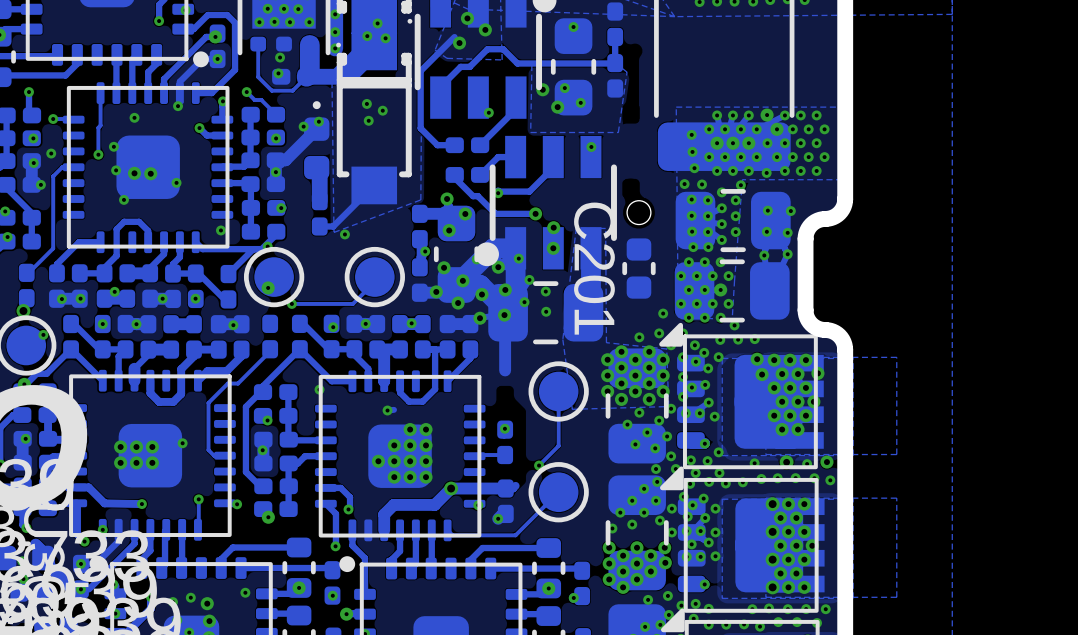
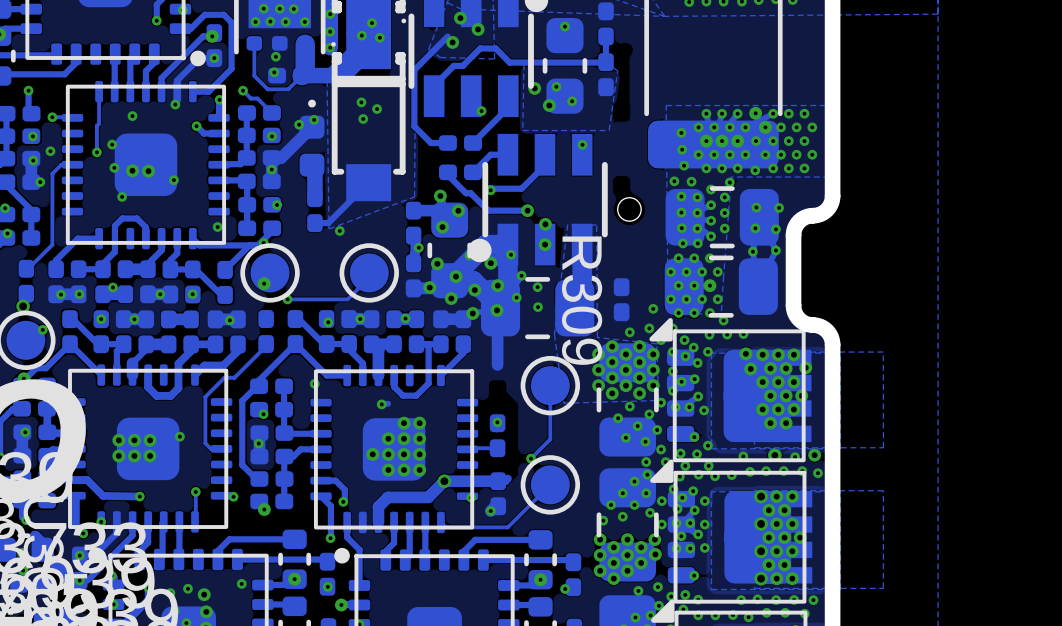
C201: (638, 268) -> none
R309: none -> (621, 299)

